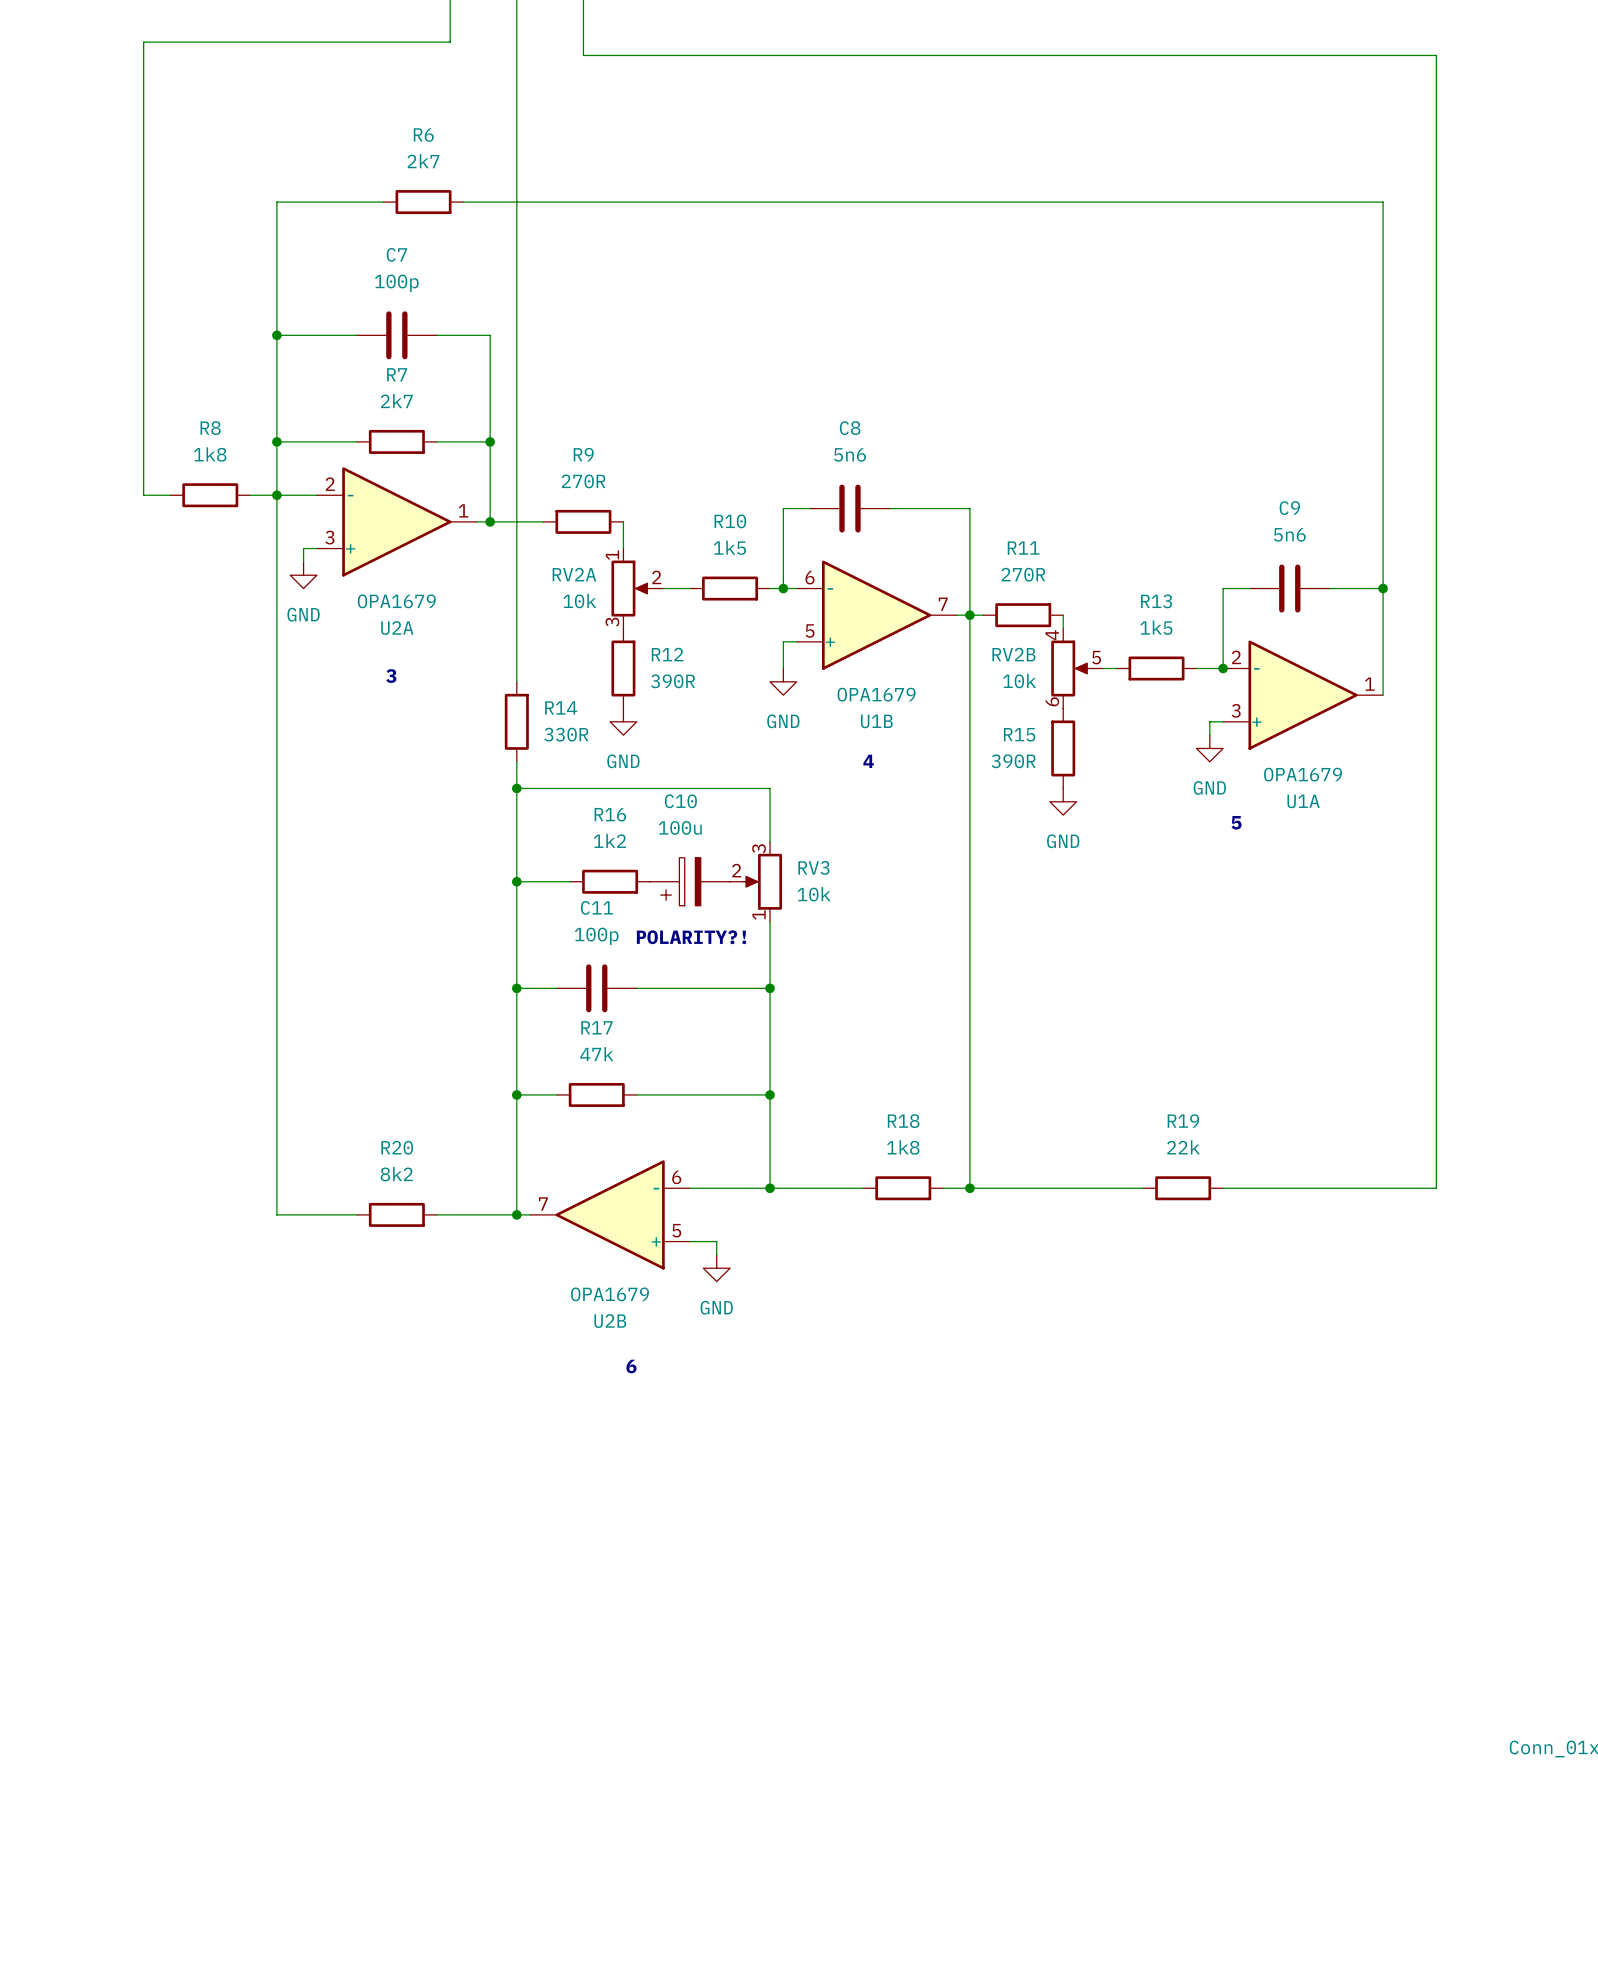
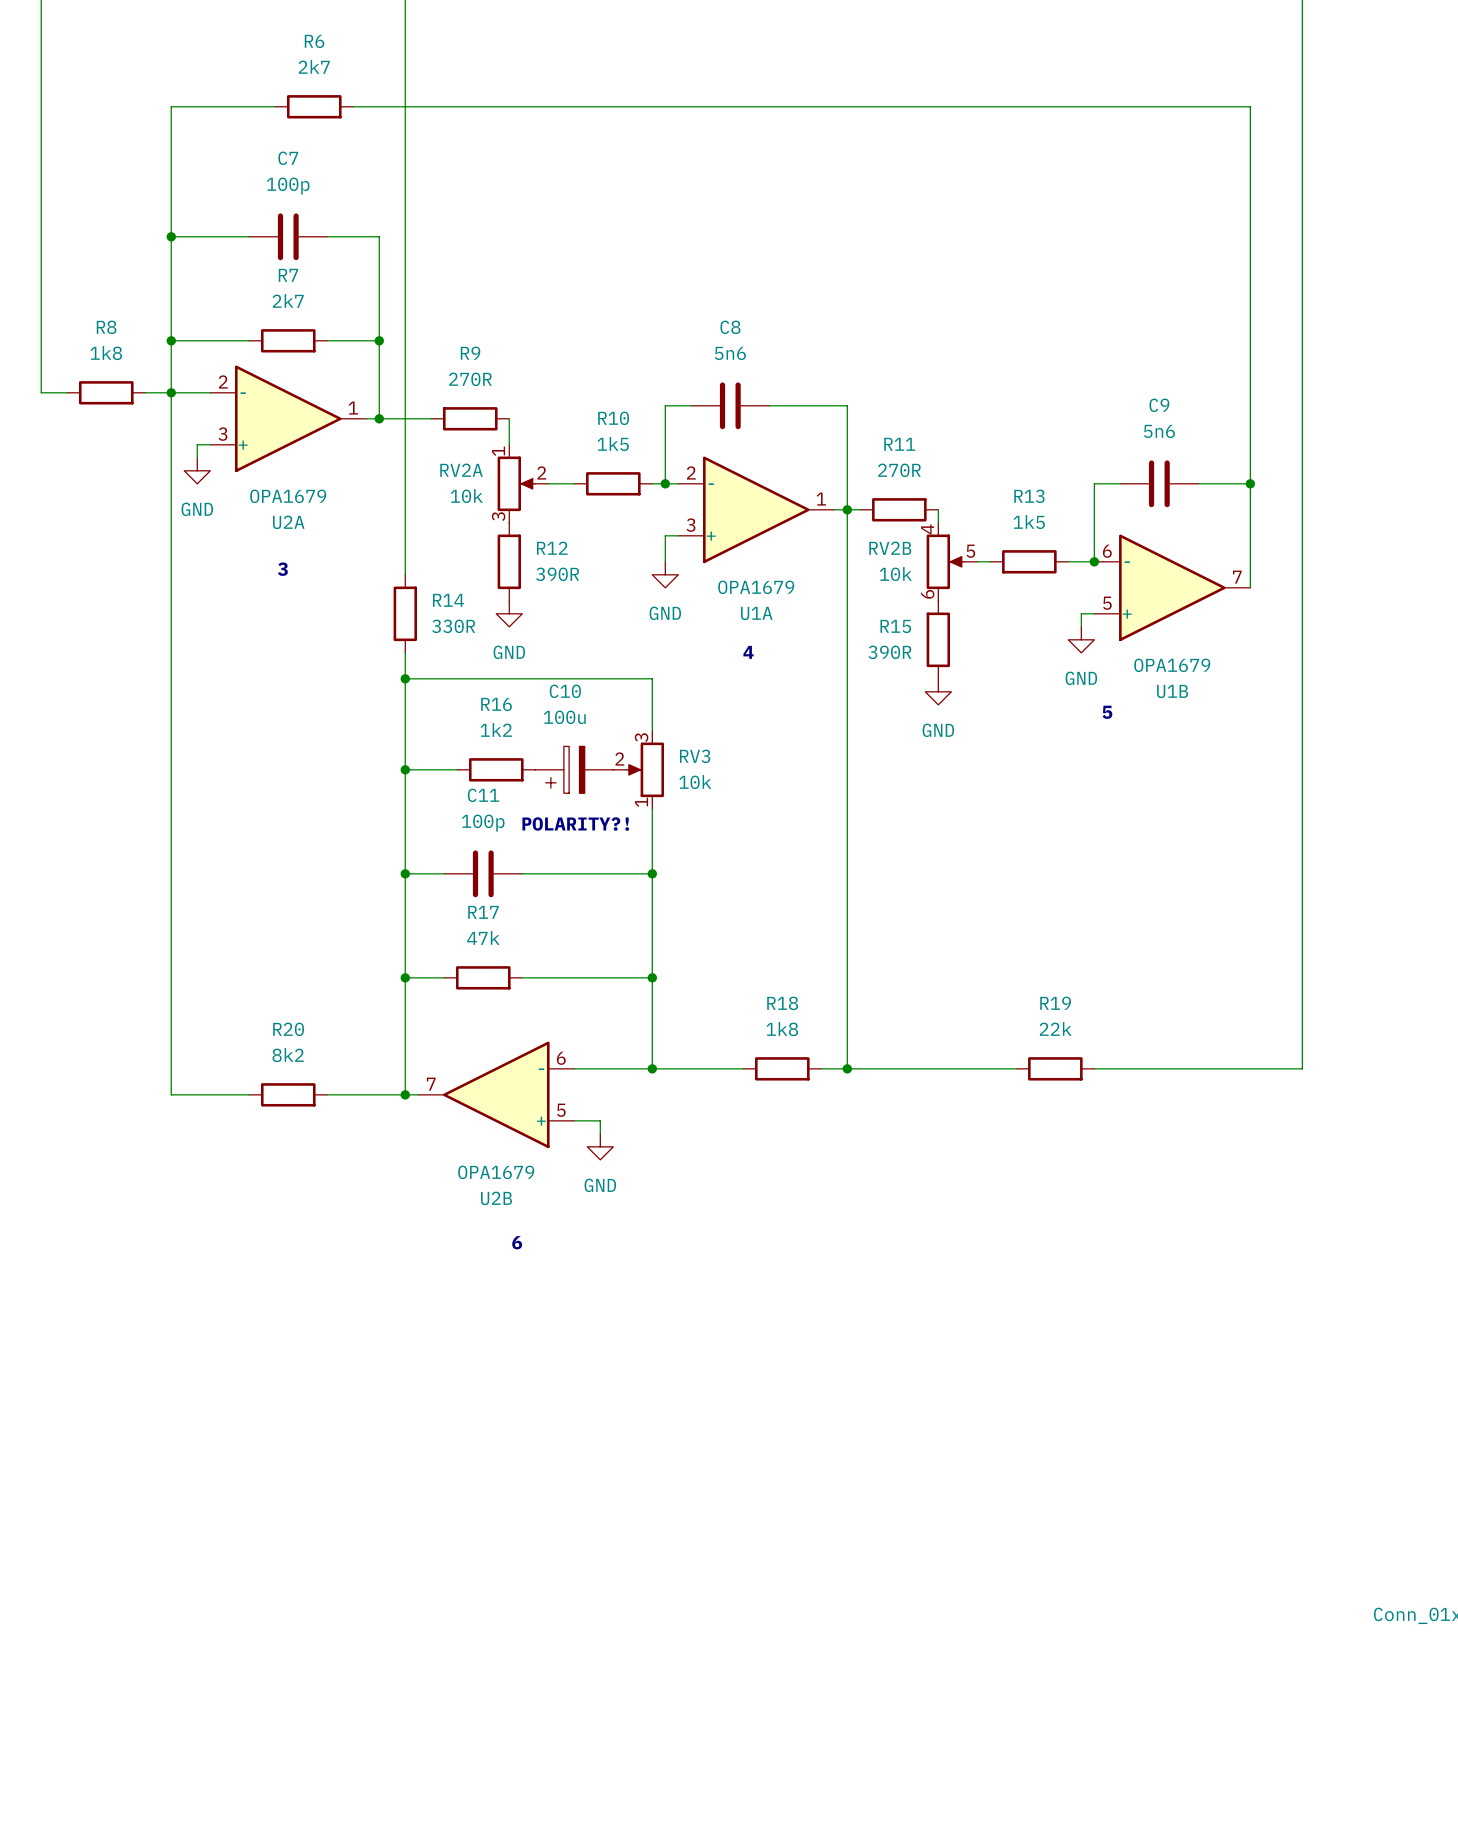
U1B position: (876, 615) -> (1172, 587)
U1A position: (1303, 695) -> (756, 509)

